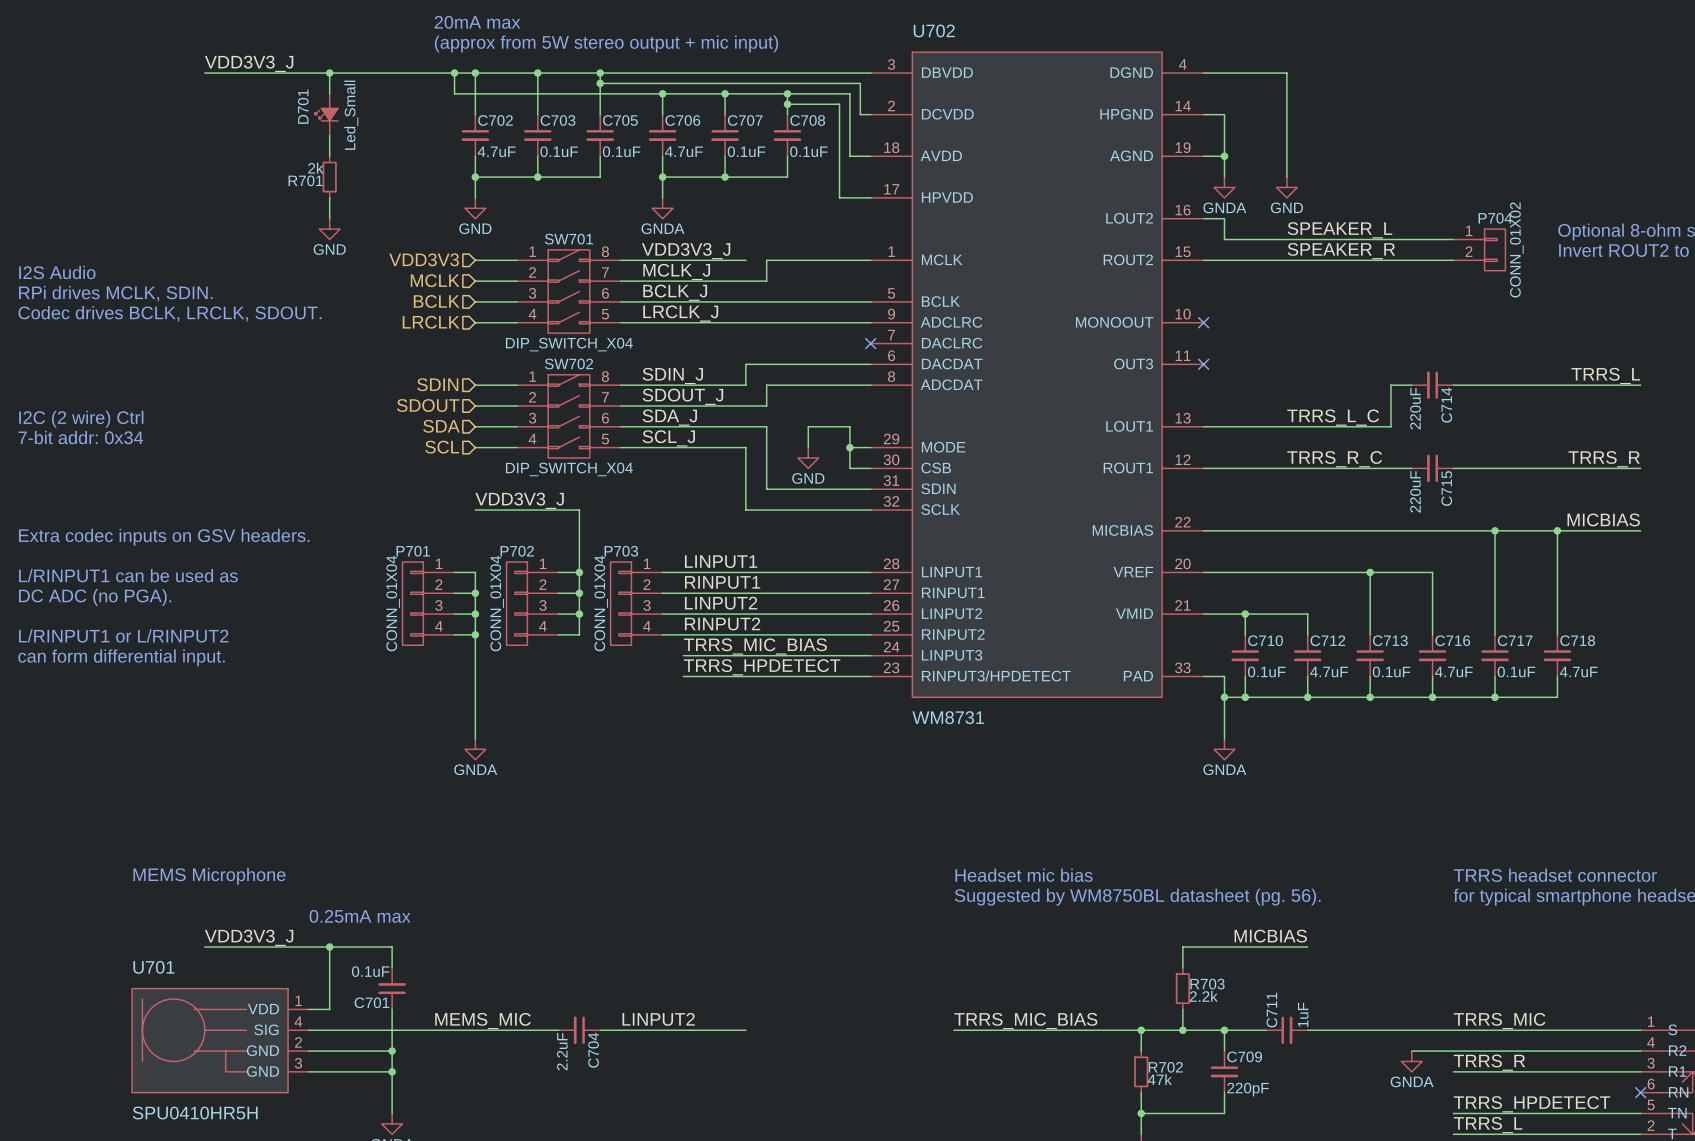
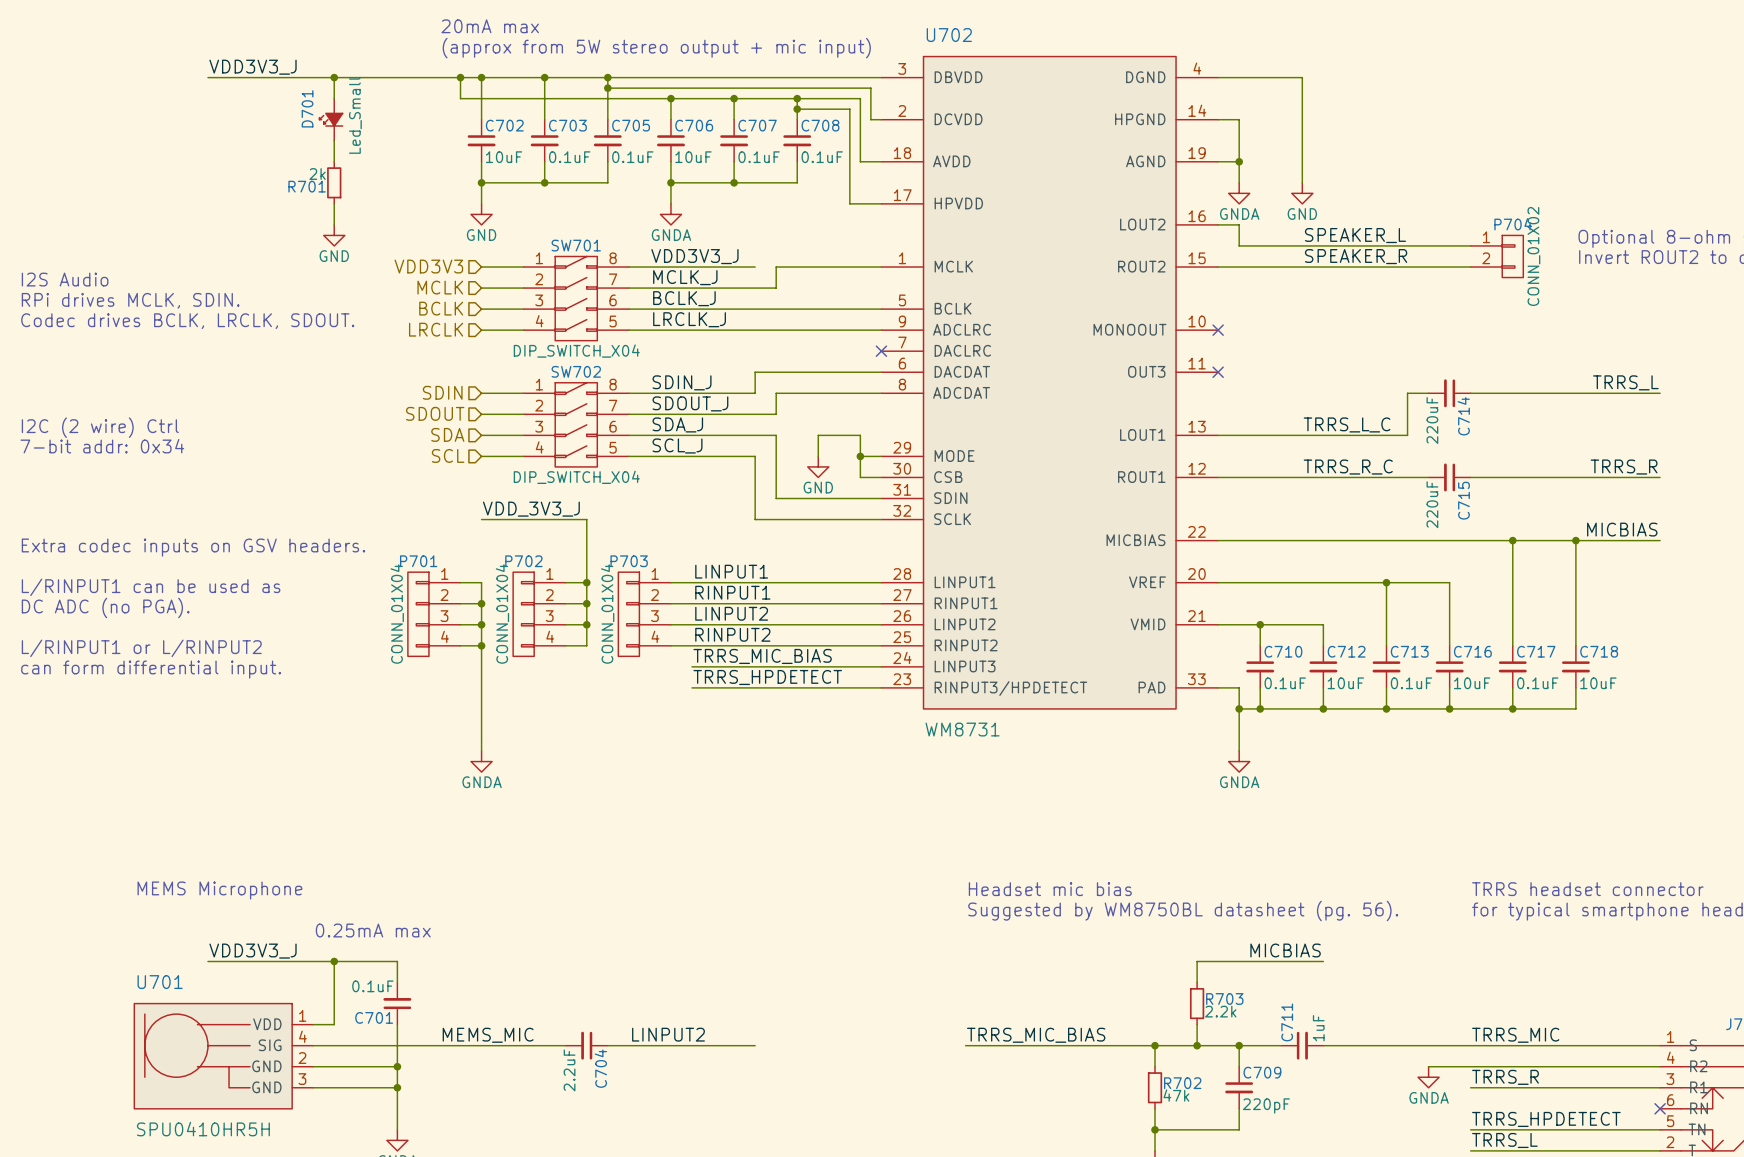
C702 value: 4.7uF (496, 151) -> 10uF (504, 157)
C706 value: 4.7uF (683, 151) -> 10uF (693, 157)
label: VDD3V3_J (519, 500) -> VDD_3V3_J (531, 509)
C712 value: 4.7uF (1329, 672) -> 10uF (1345, 683)
C716 value: 4.7uF (1453, 672) -> 10uF (1472, 683)
C718 value: 4.7uF (1578, 672) -> 10uF (1598, 683)

